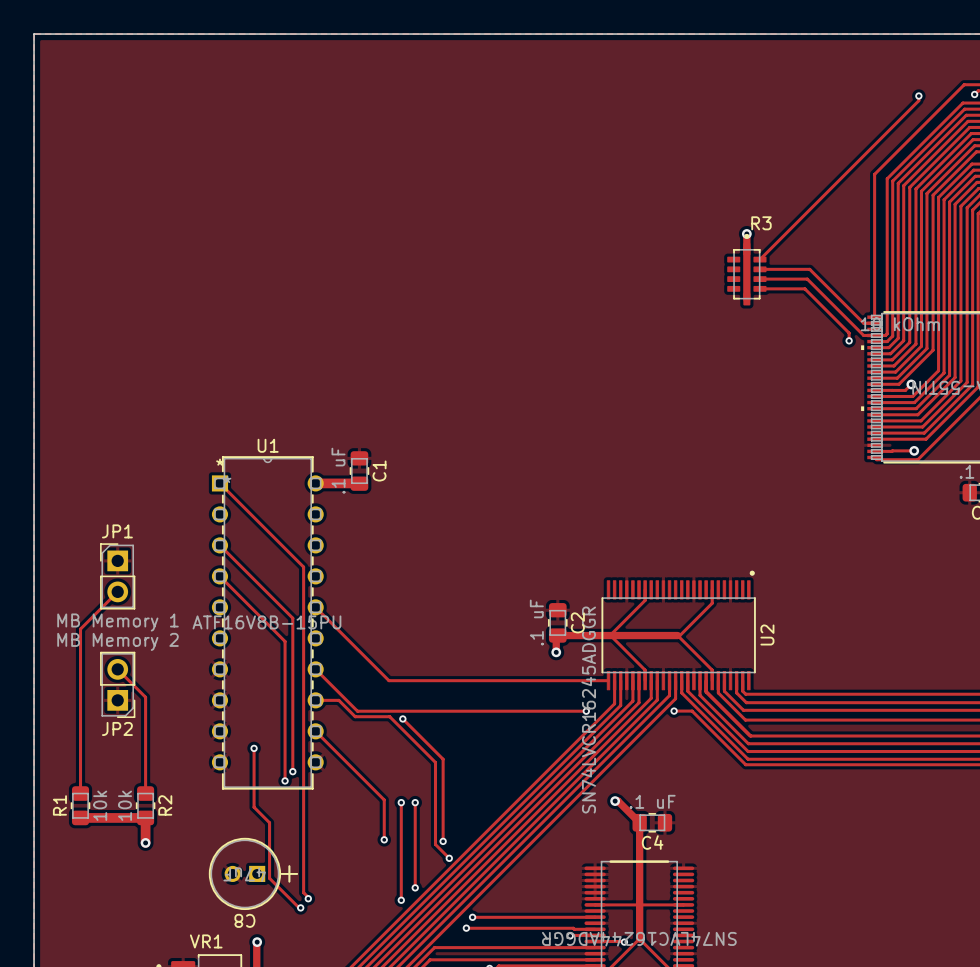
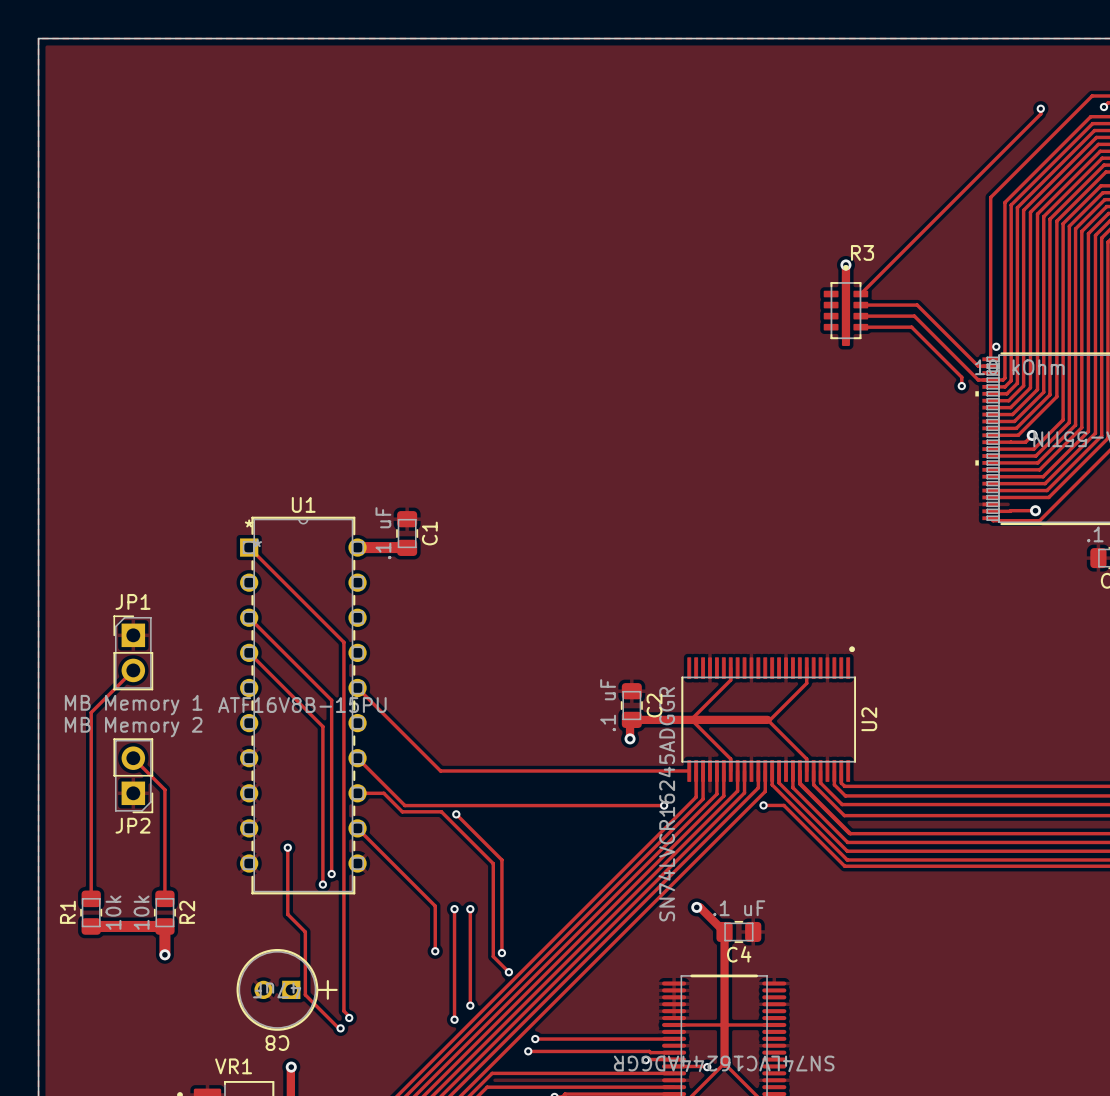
via: none -> (996, 346)

